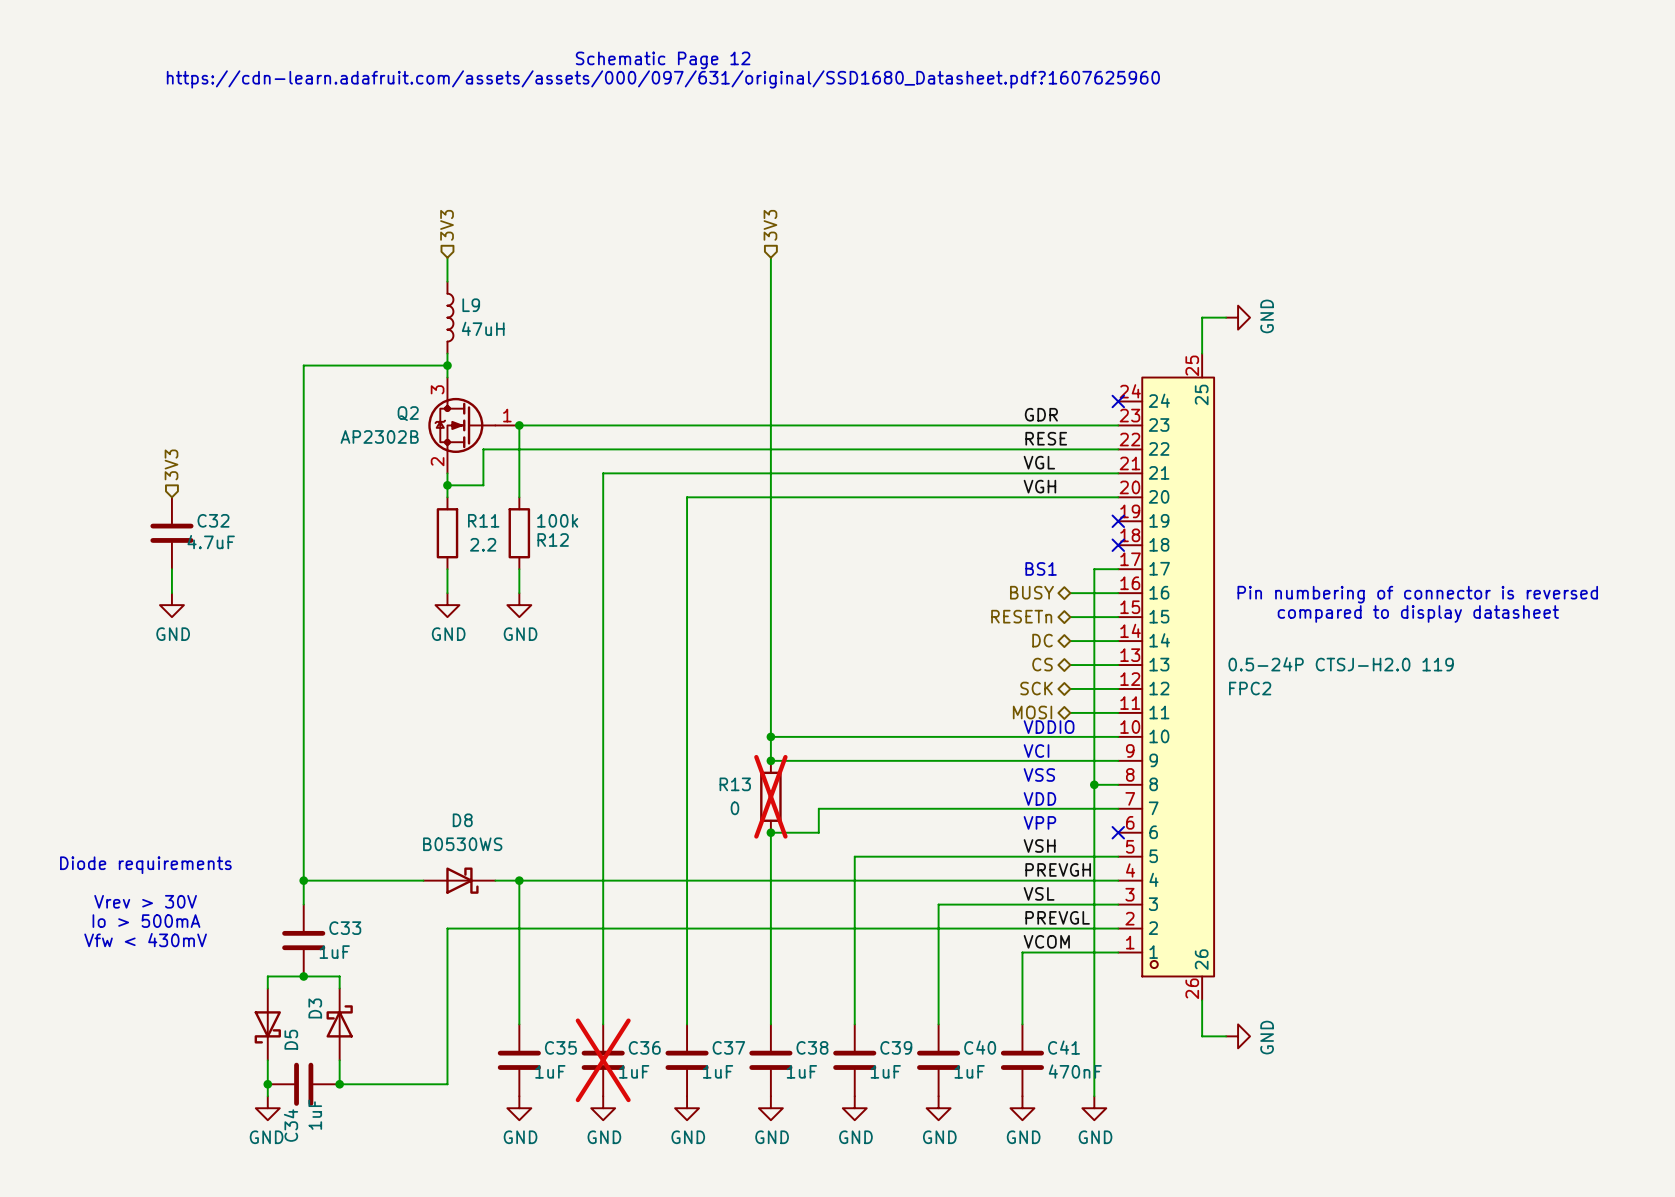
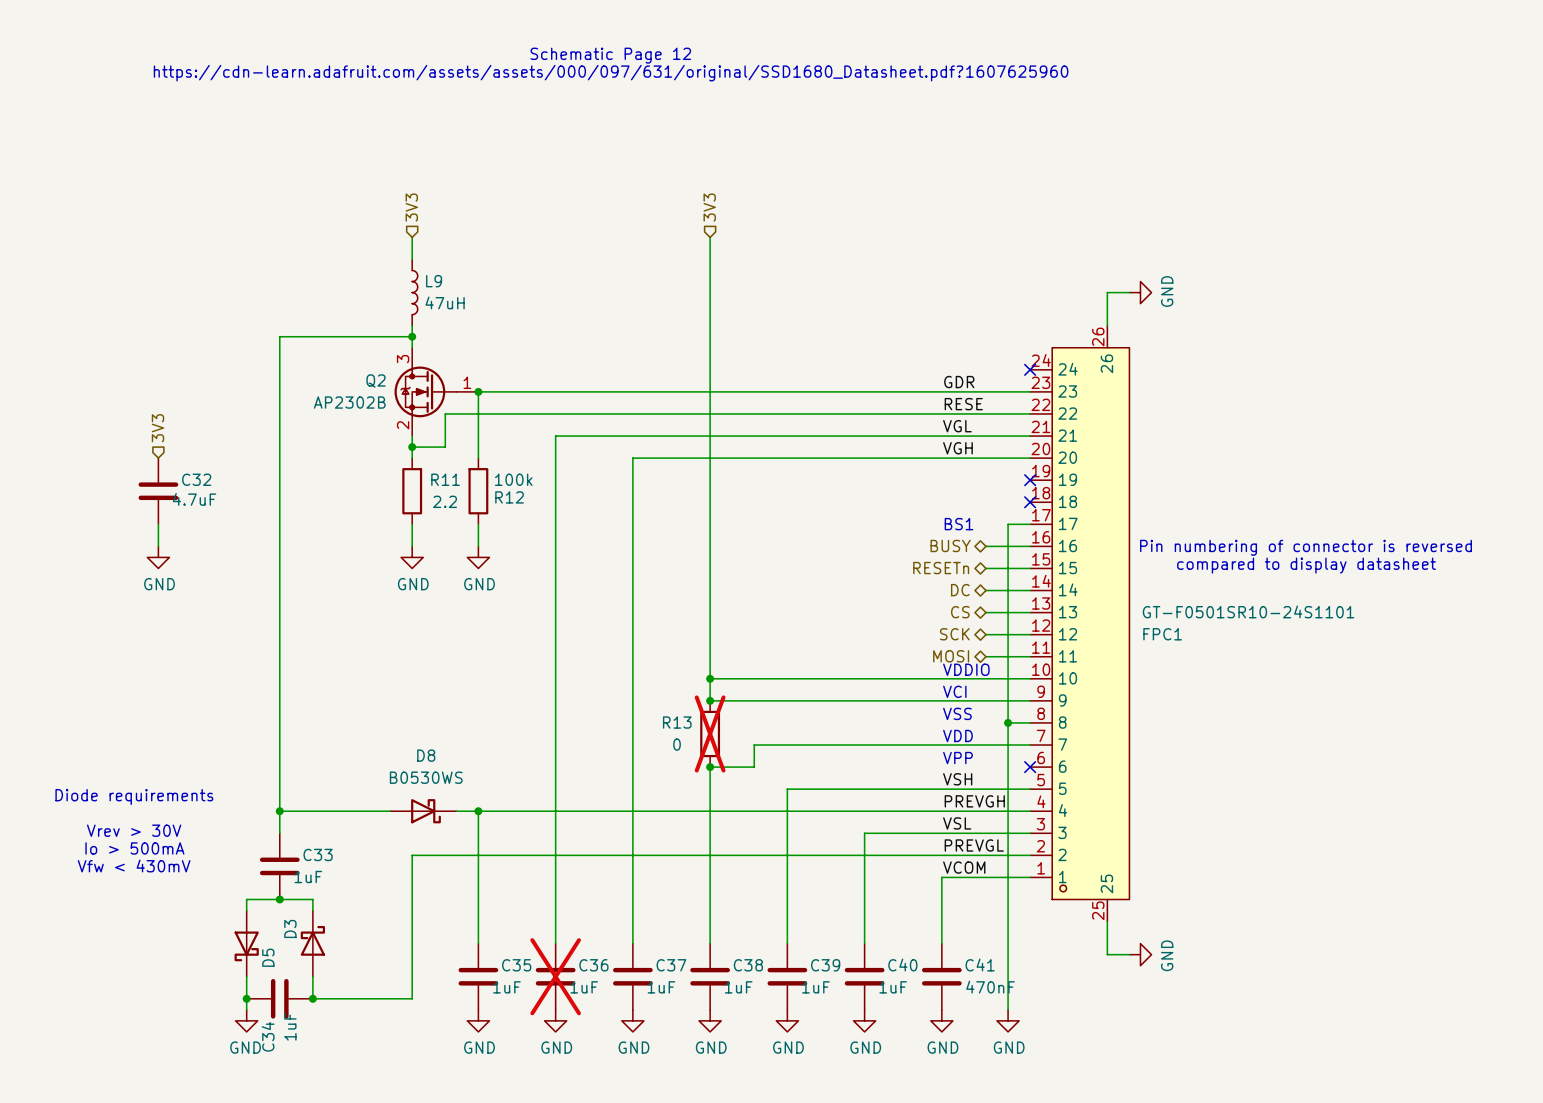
FPC2: 0.5-24P CTSJ-H2.0 119 (1166, 677) -> none
FPC1: none -> GT-F0501SR10-24S1101 (1079, 623)

